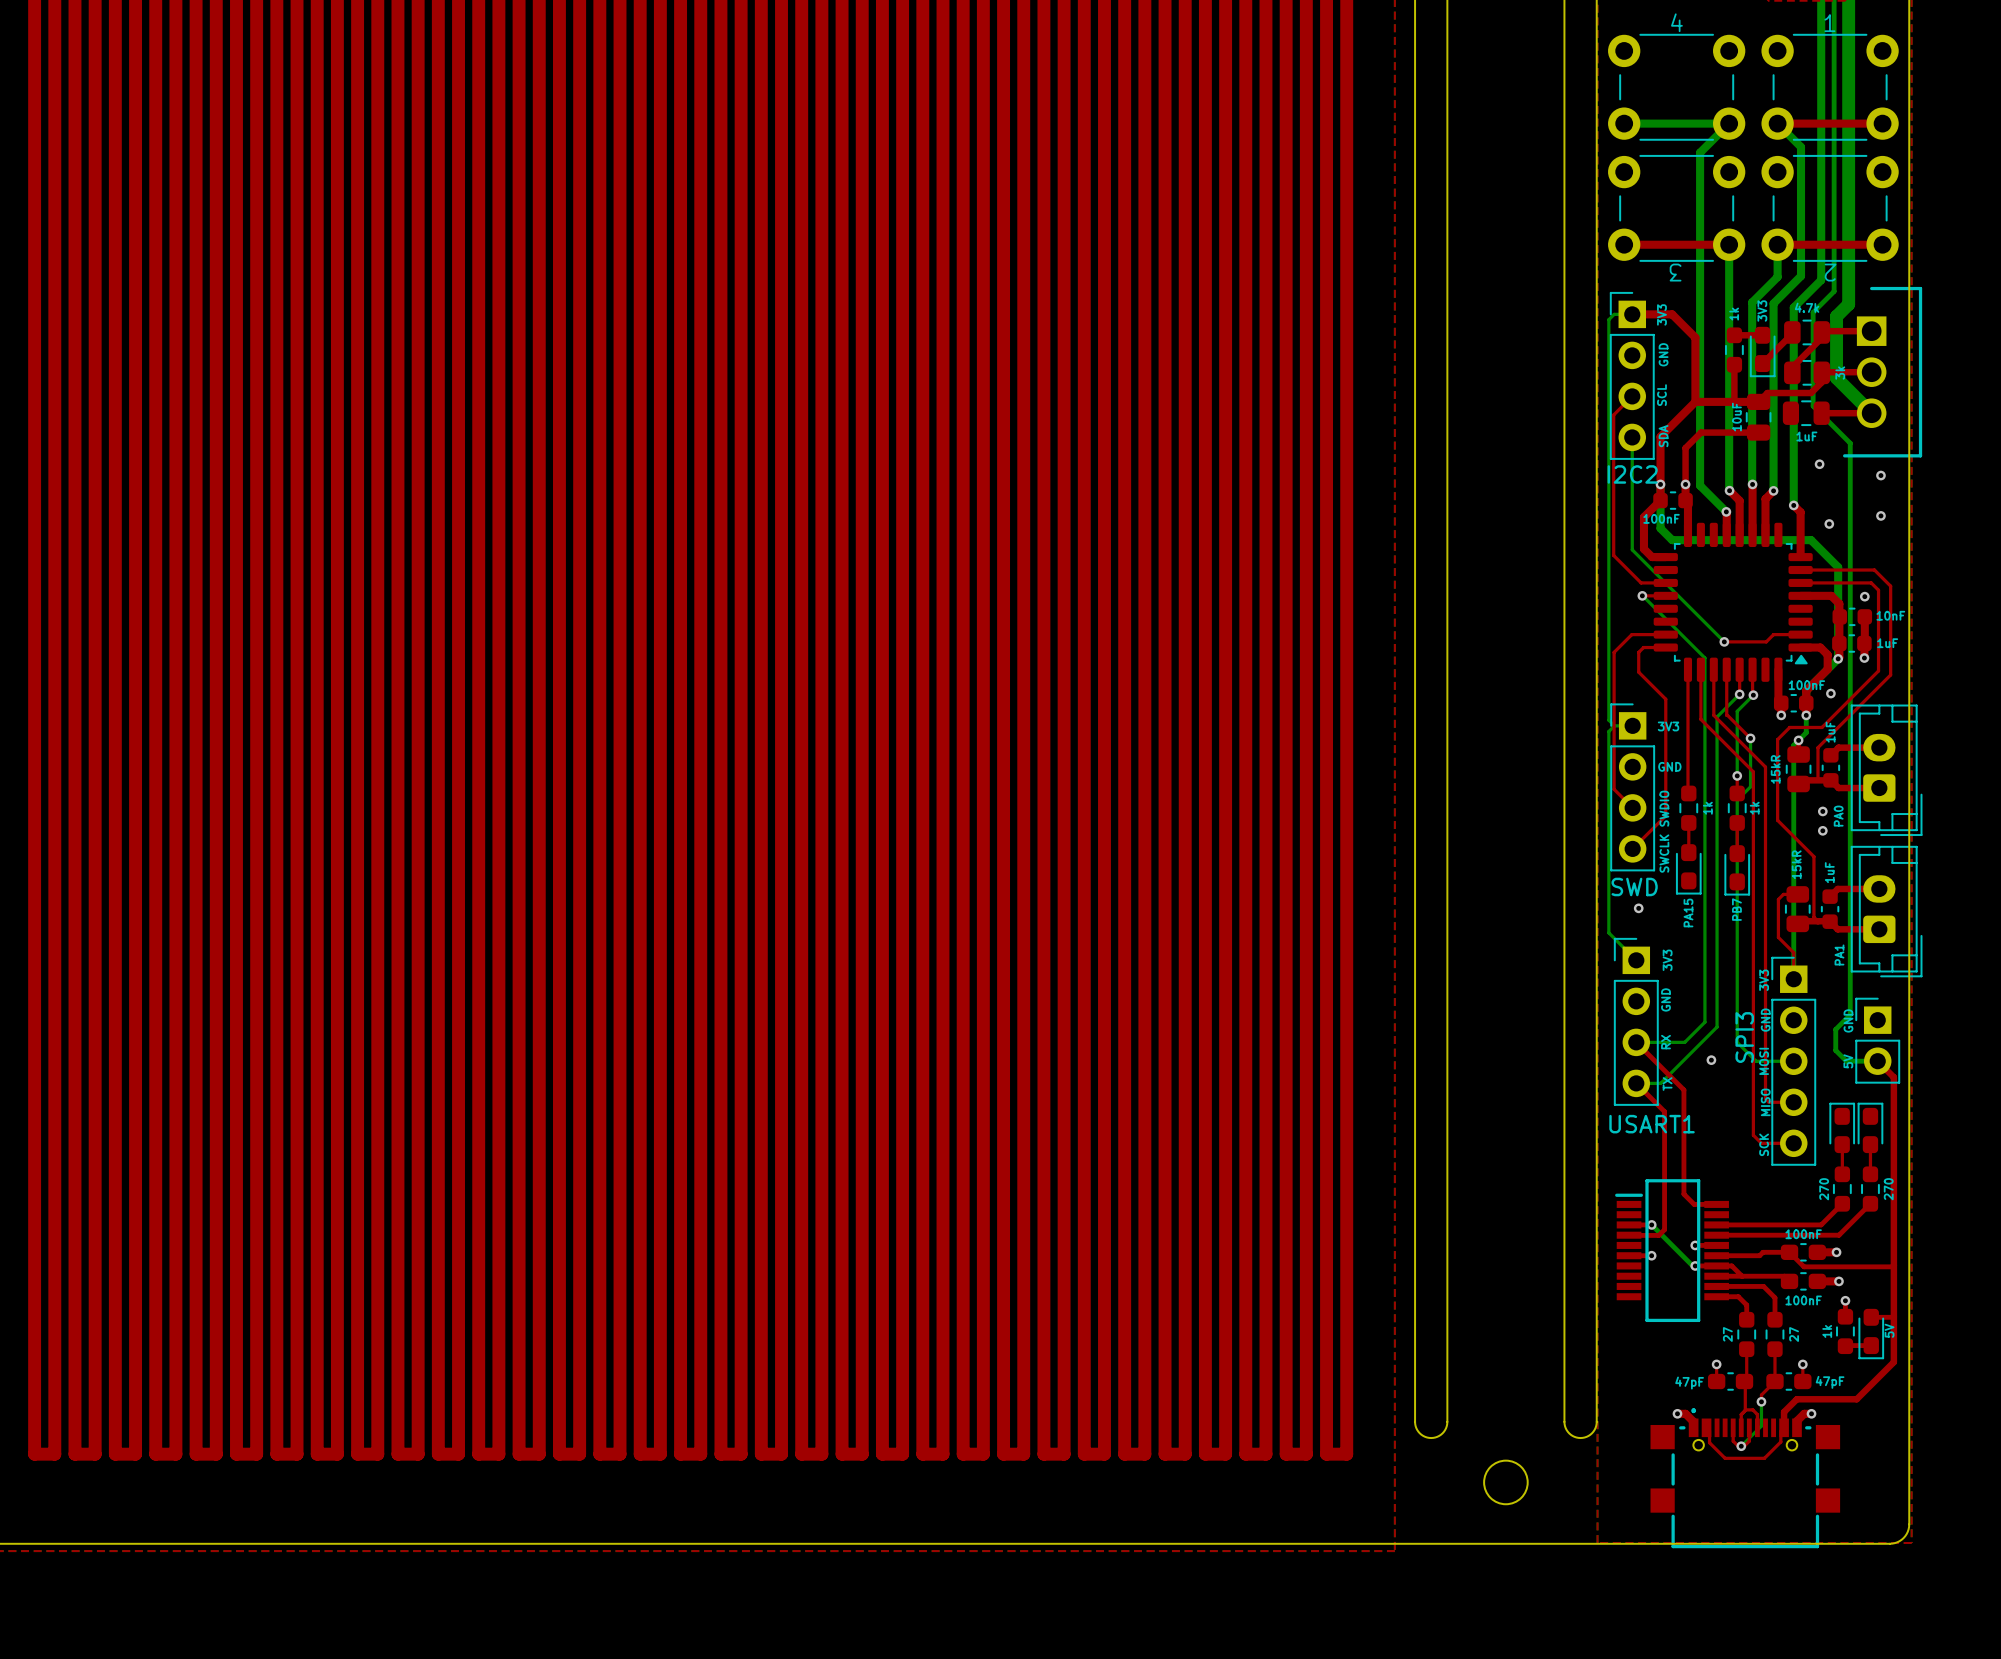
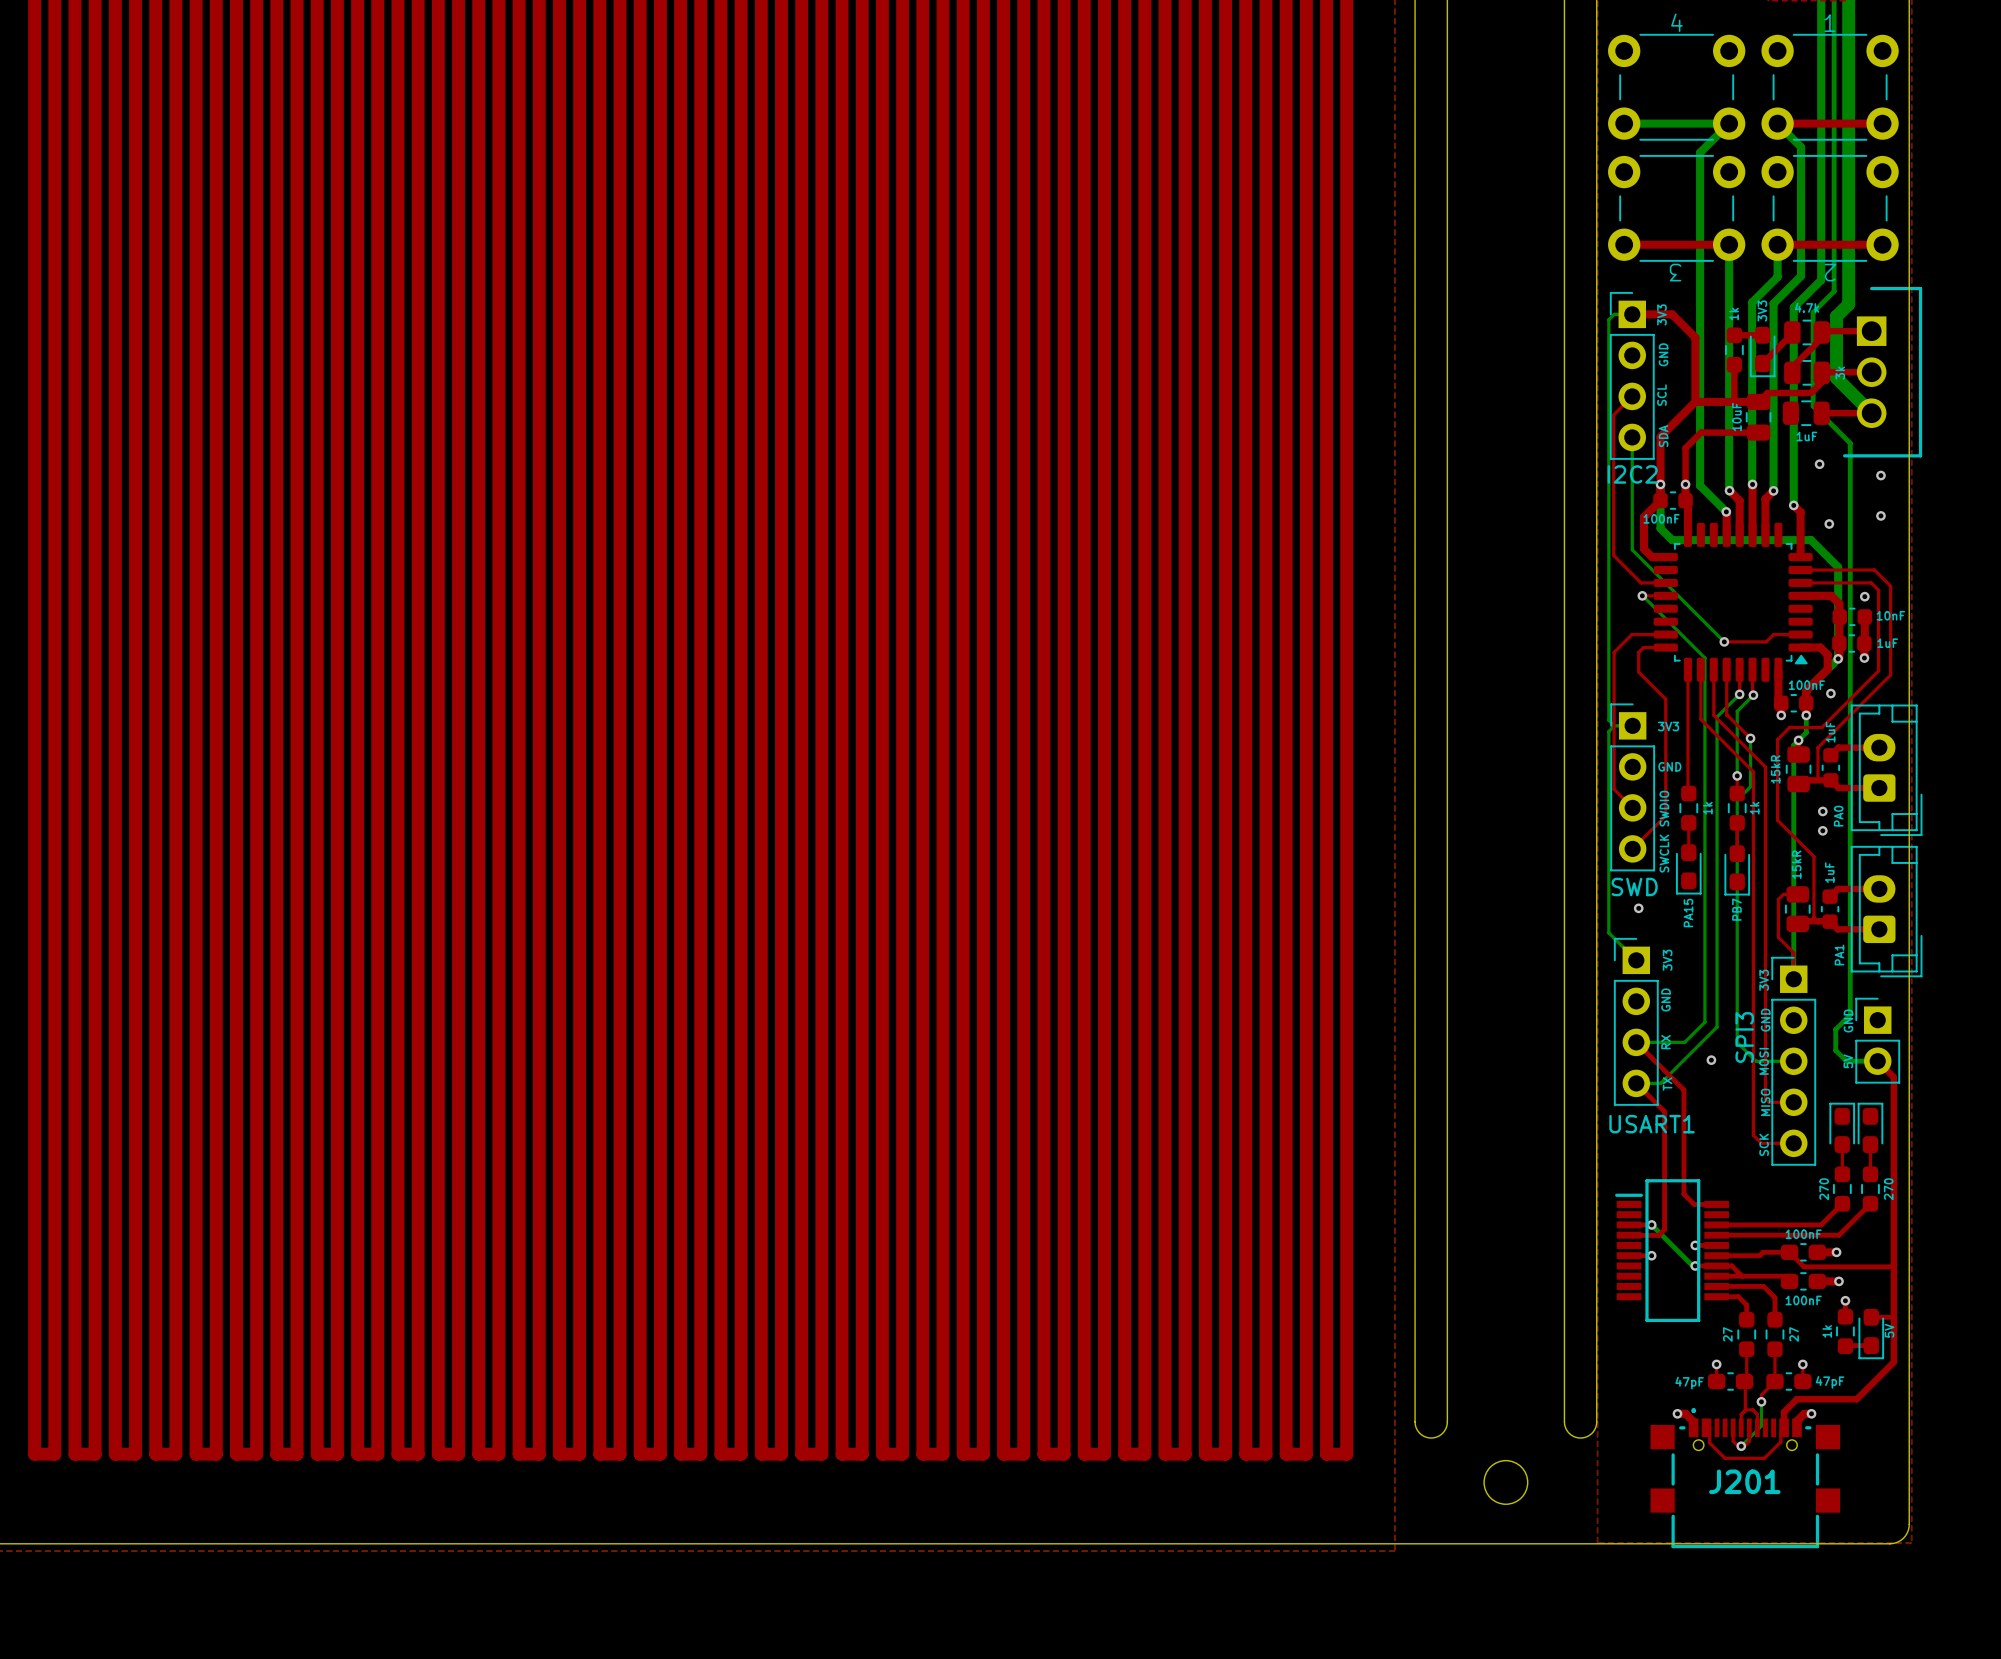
J201 name: none -> J201 (1744, 1481)

